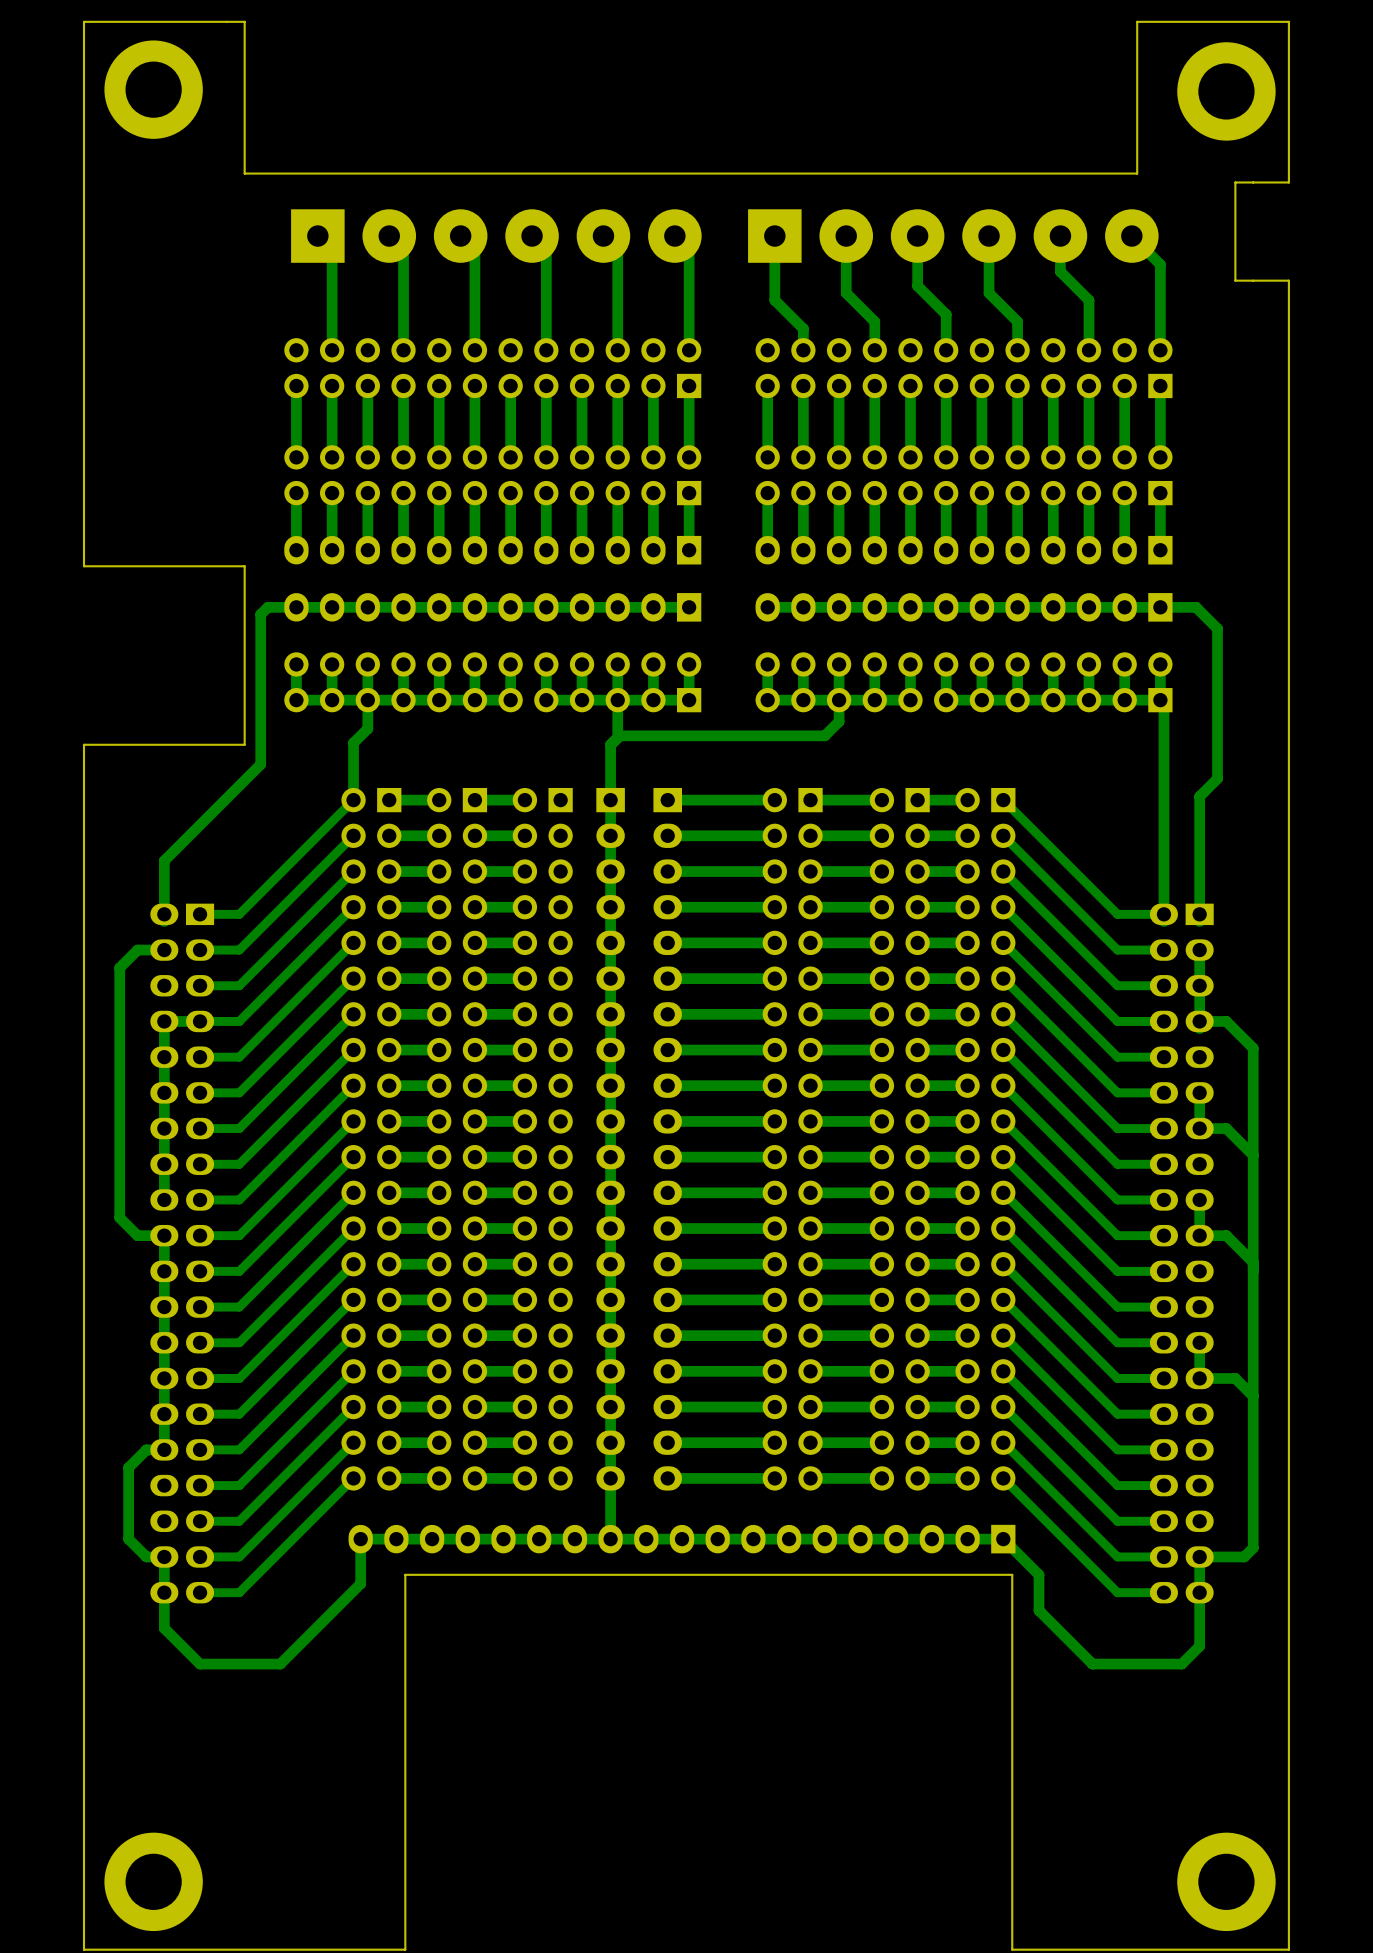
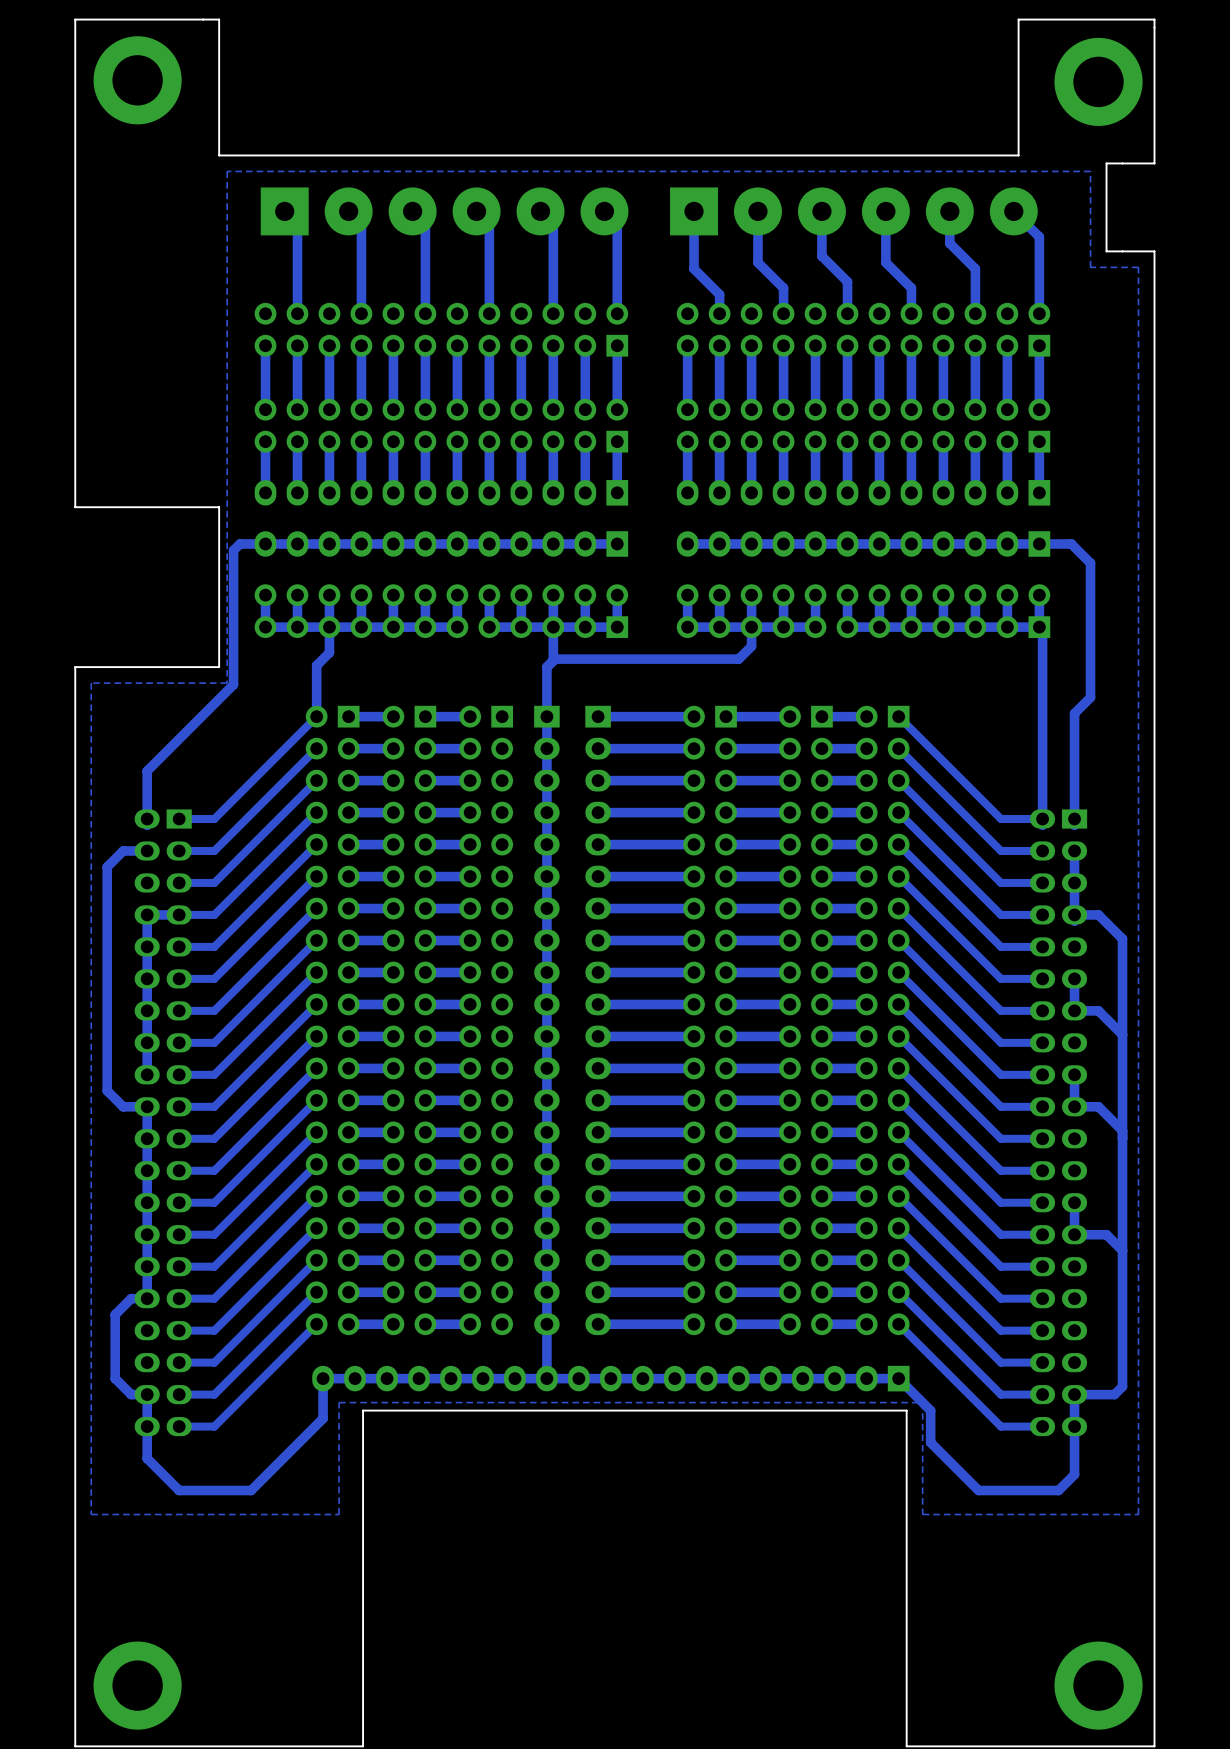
bottom zone outline: none -> (1090, 171) (1090, 267) (1138, 267) (1138, 1514) (922, 1514) (922, 1402) (339, 1402) (339, 1514) (91, 1514) (91, 683) (227, 683) (227, 171) (1090, 171)

